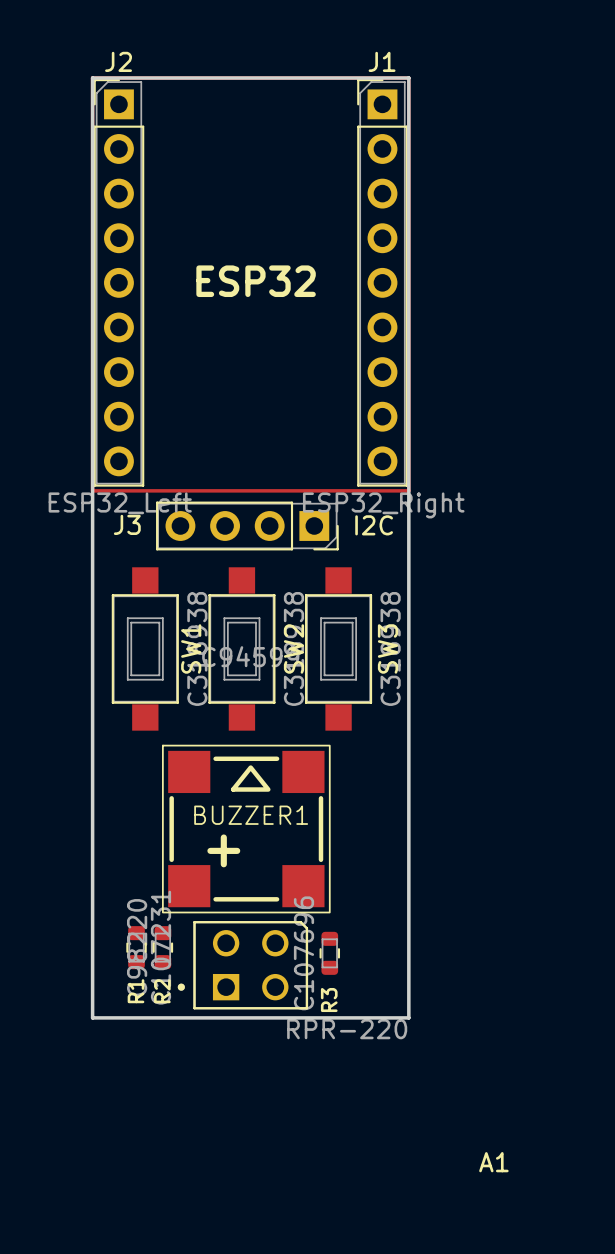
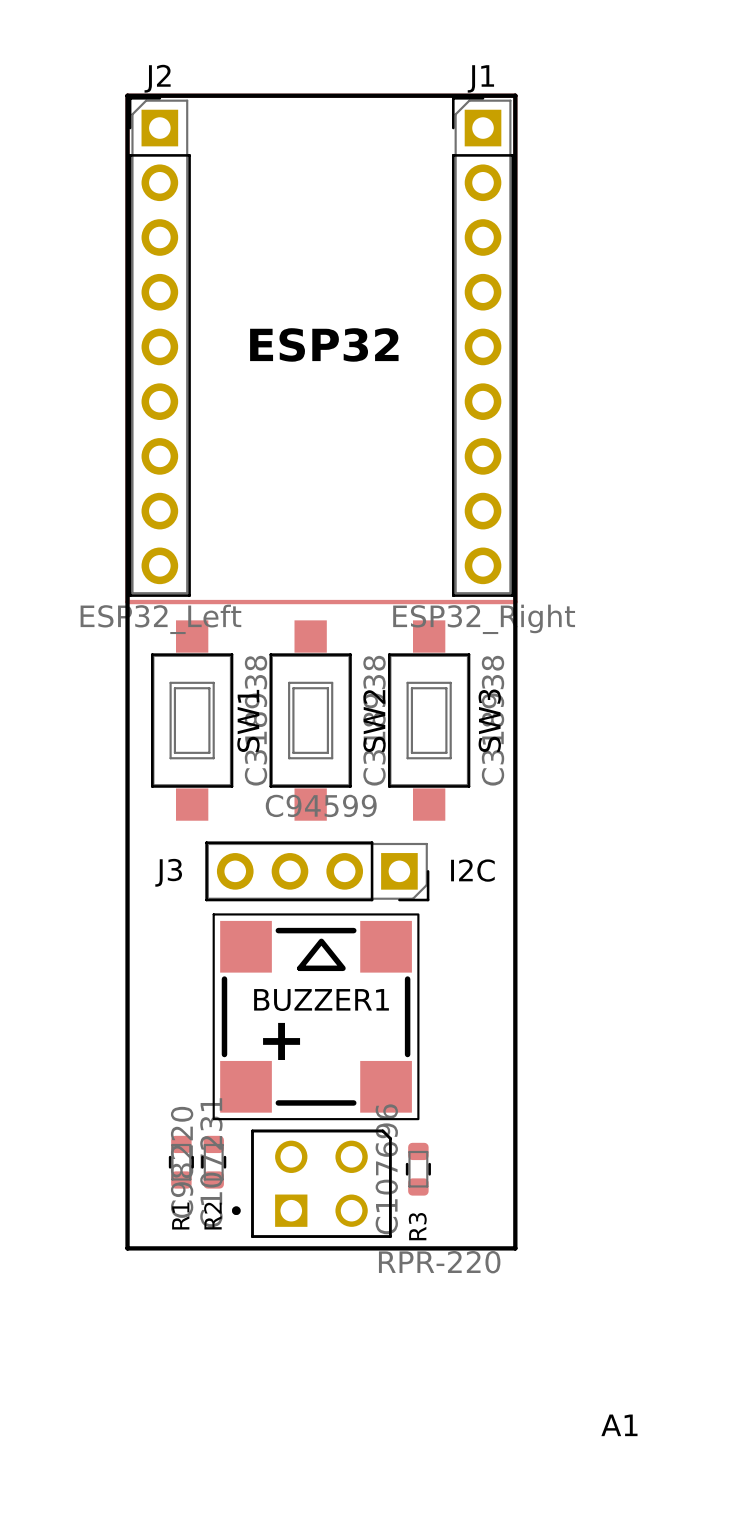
J3 position: (247, 525) -> (317, 871)
SW1 position: (145, 648) -> (192, 720)
SW2 position: (241, 648) -> (310, 720)
SW3 position: (338, 648) -> (429, 720)

